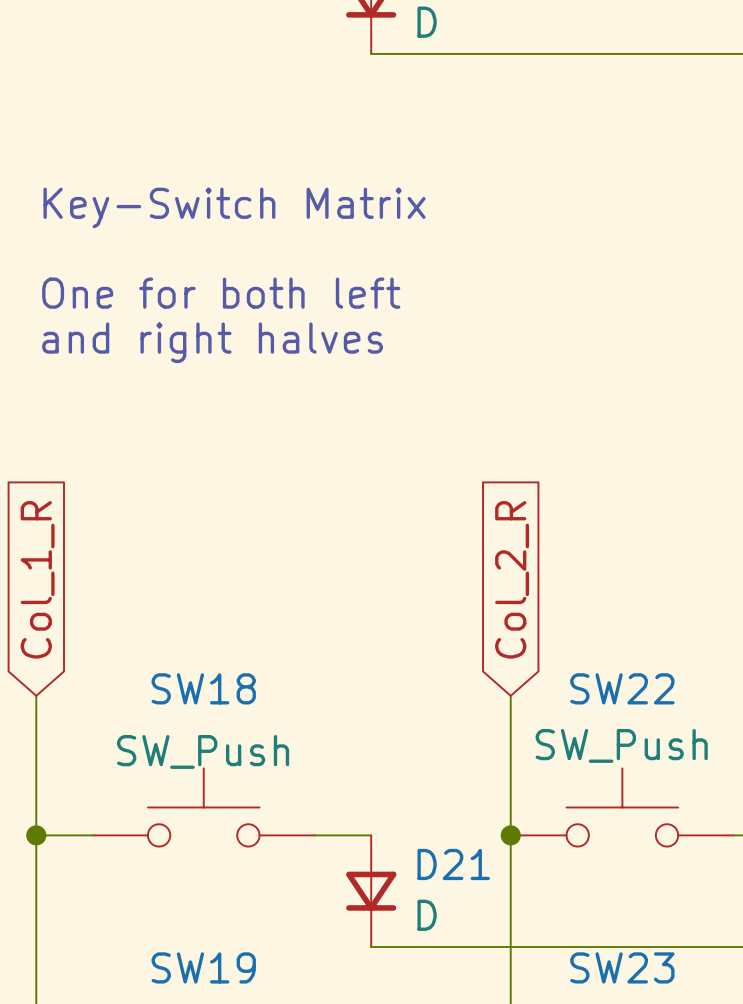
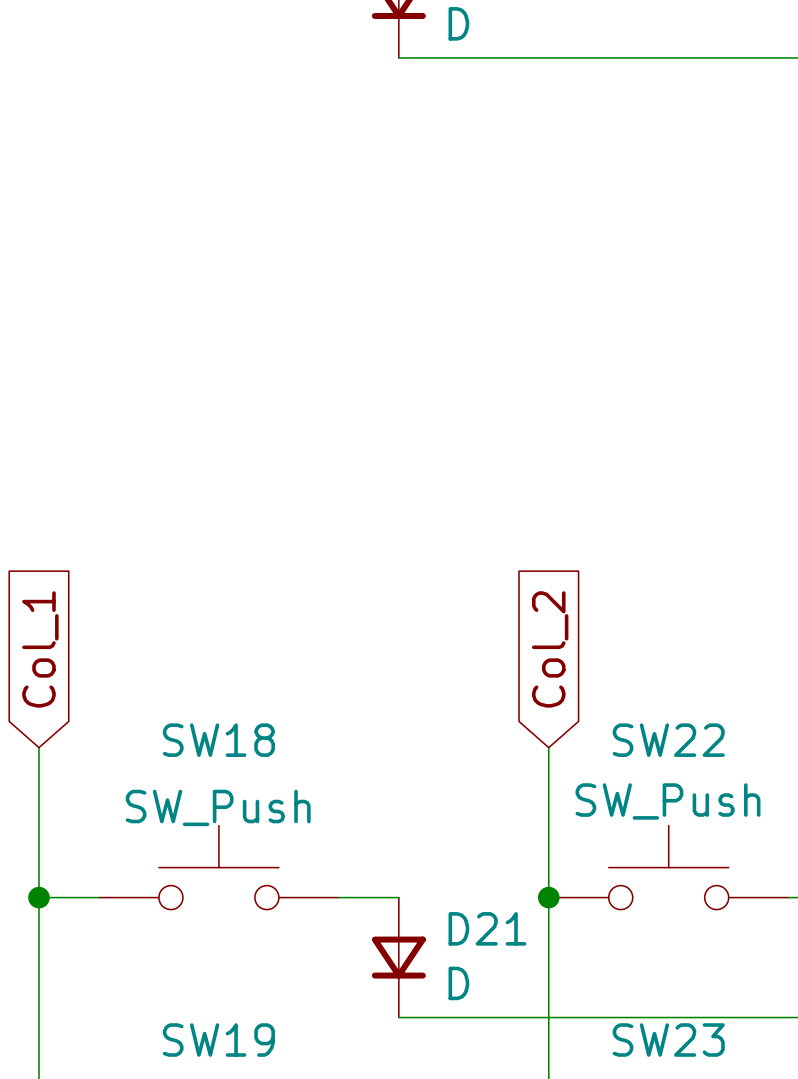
text: Key-Switch Matrix (234, 207) -> none
text: One for both left (221, 293) -> none
text: and right halves (212, 342) -> none
global label: Col_1_R (37, 579) -> Col_1 (40, 649)
global label: Col_2_R (512, 579) -> Col_2 (550, 649)

